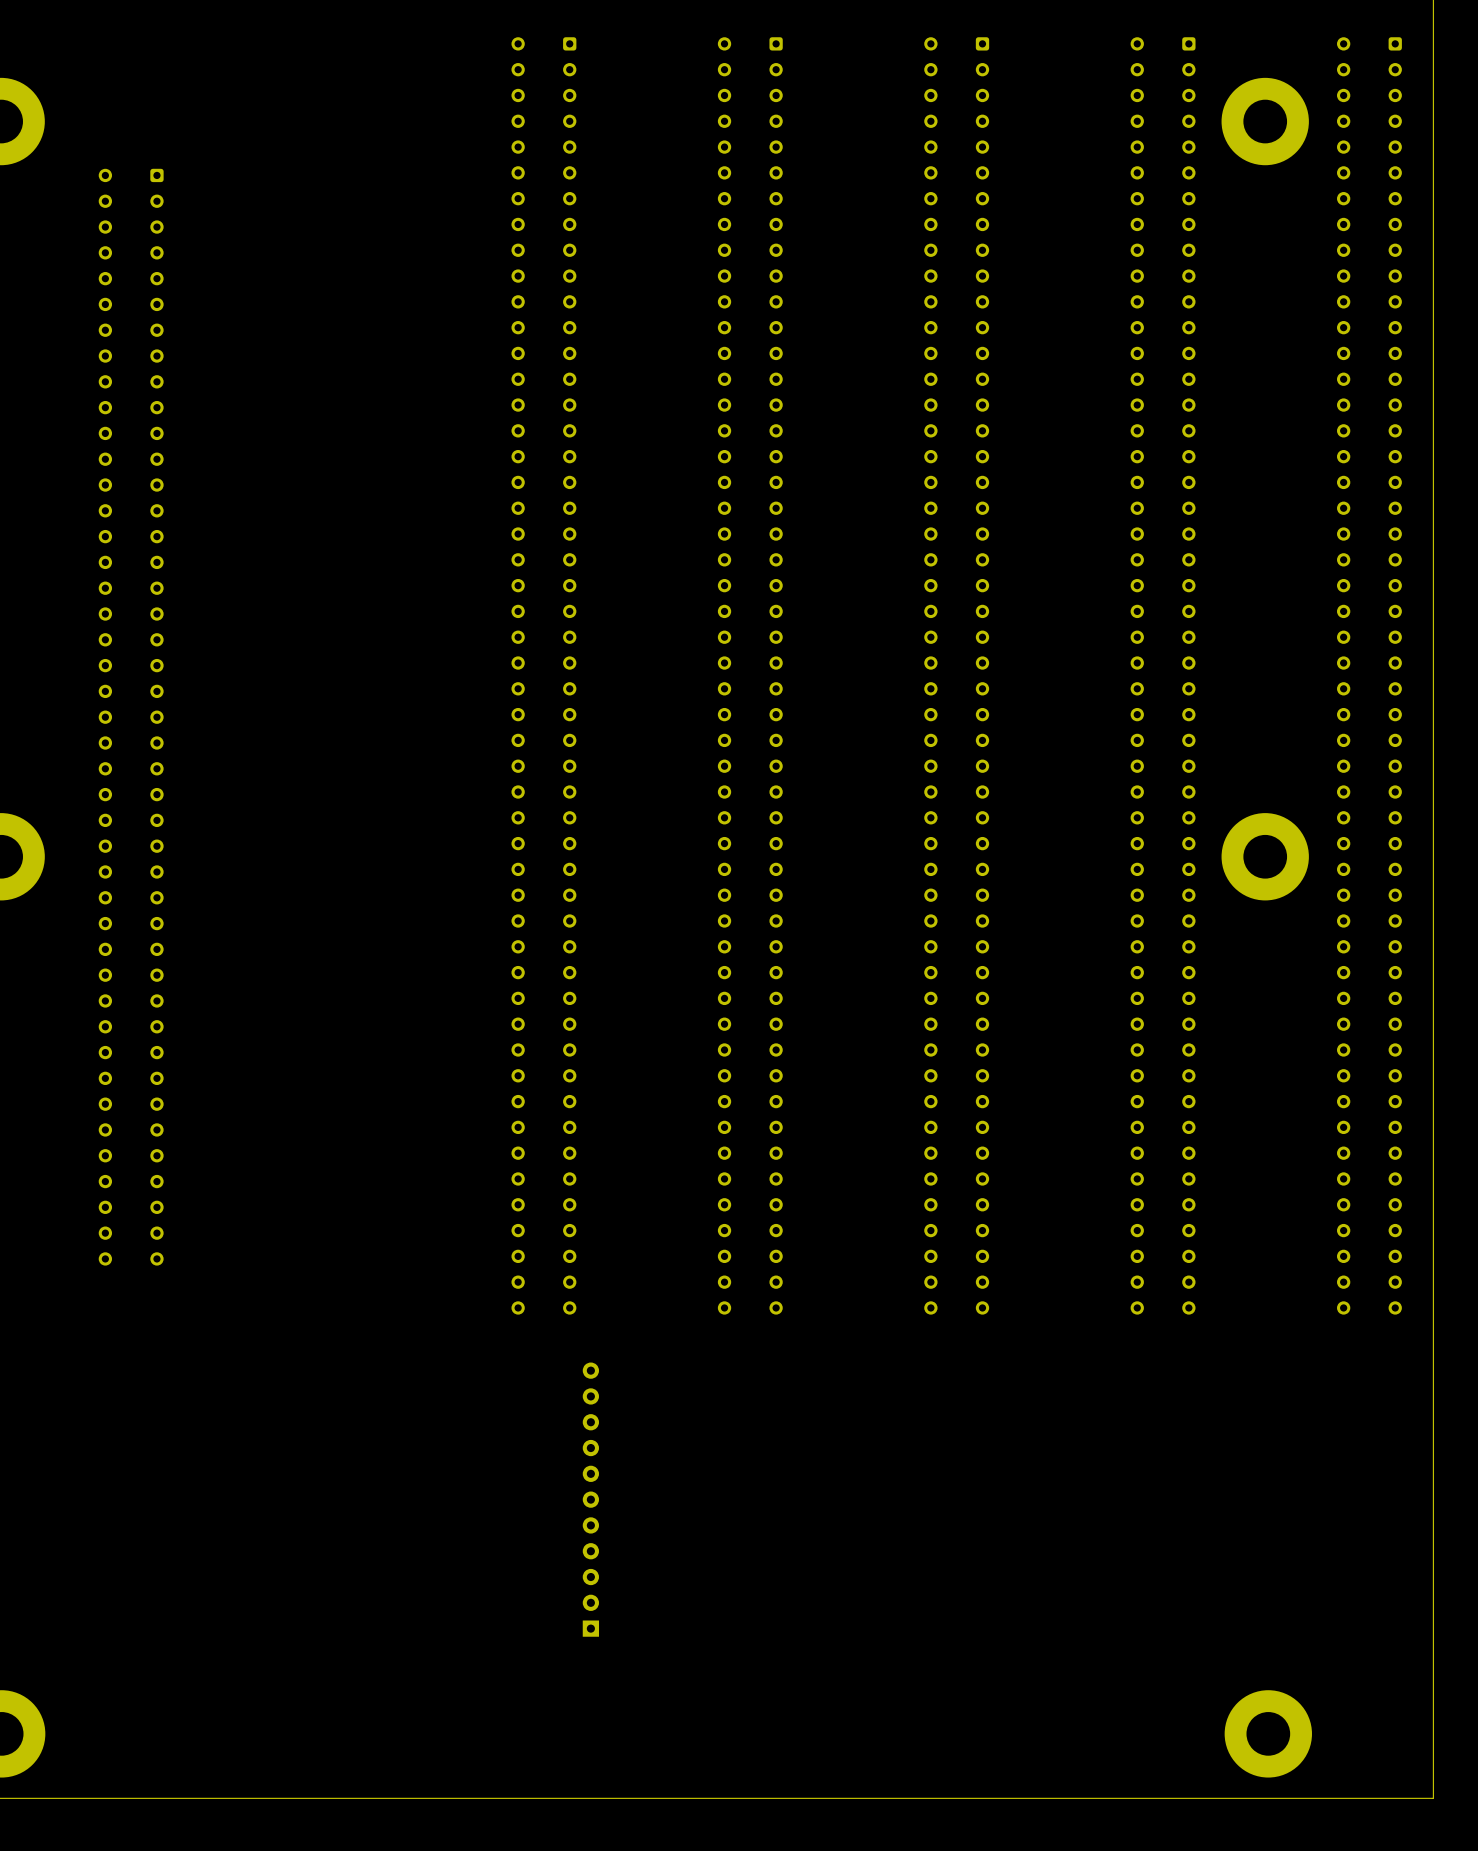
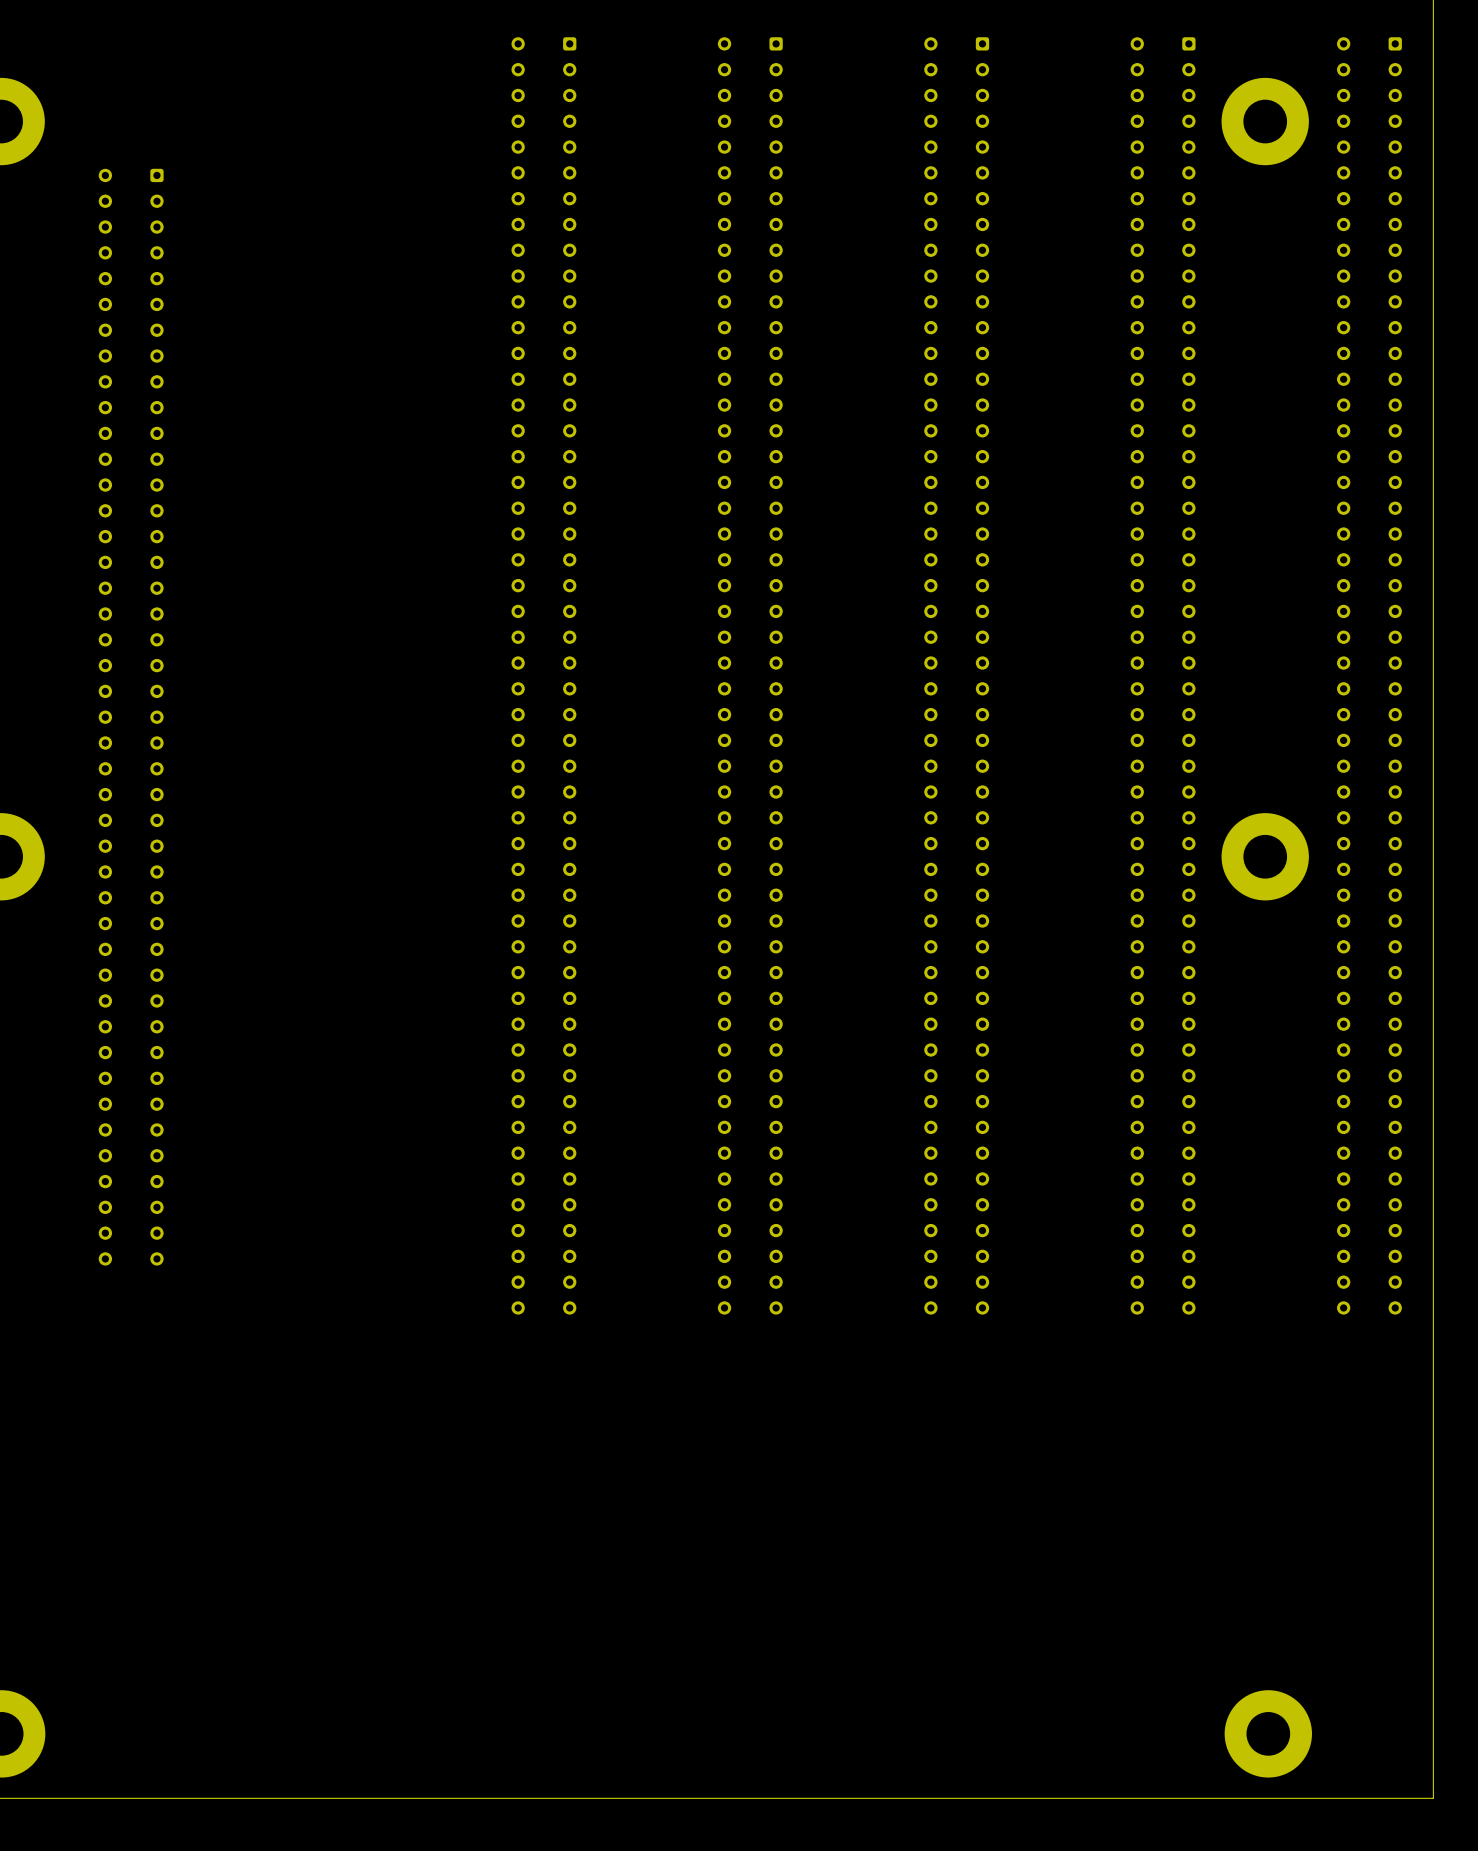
part: (590, 1499) -> none

